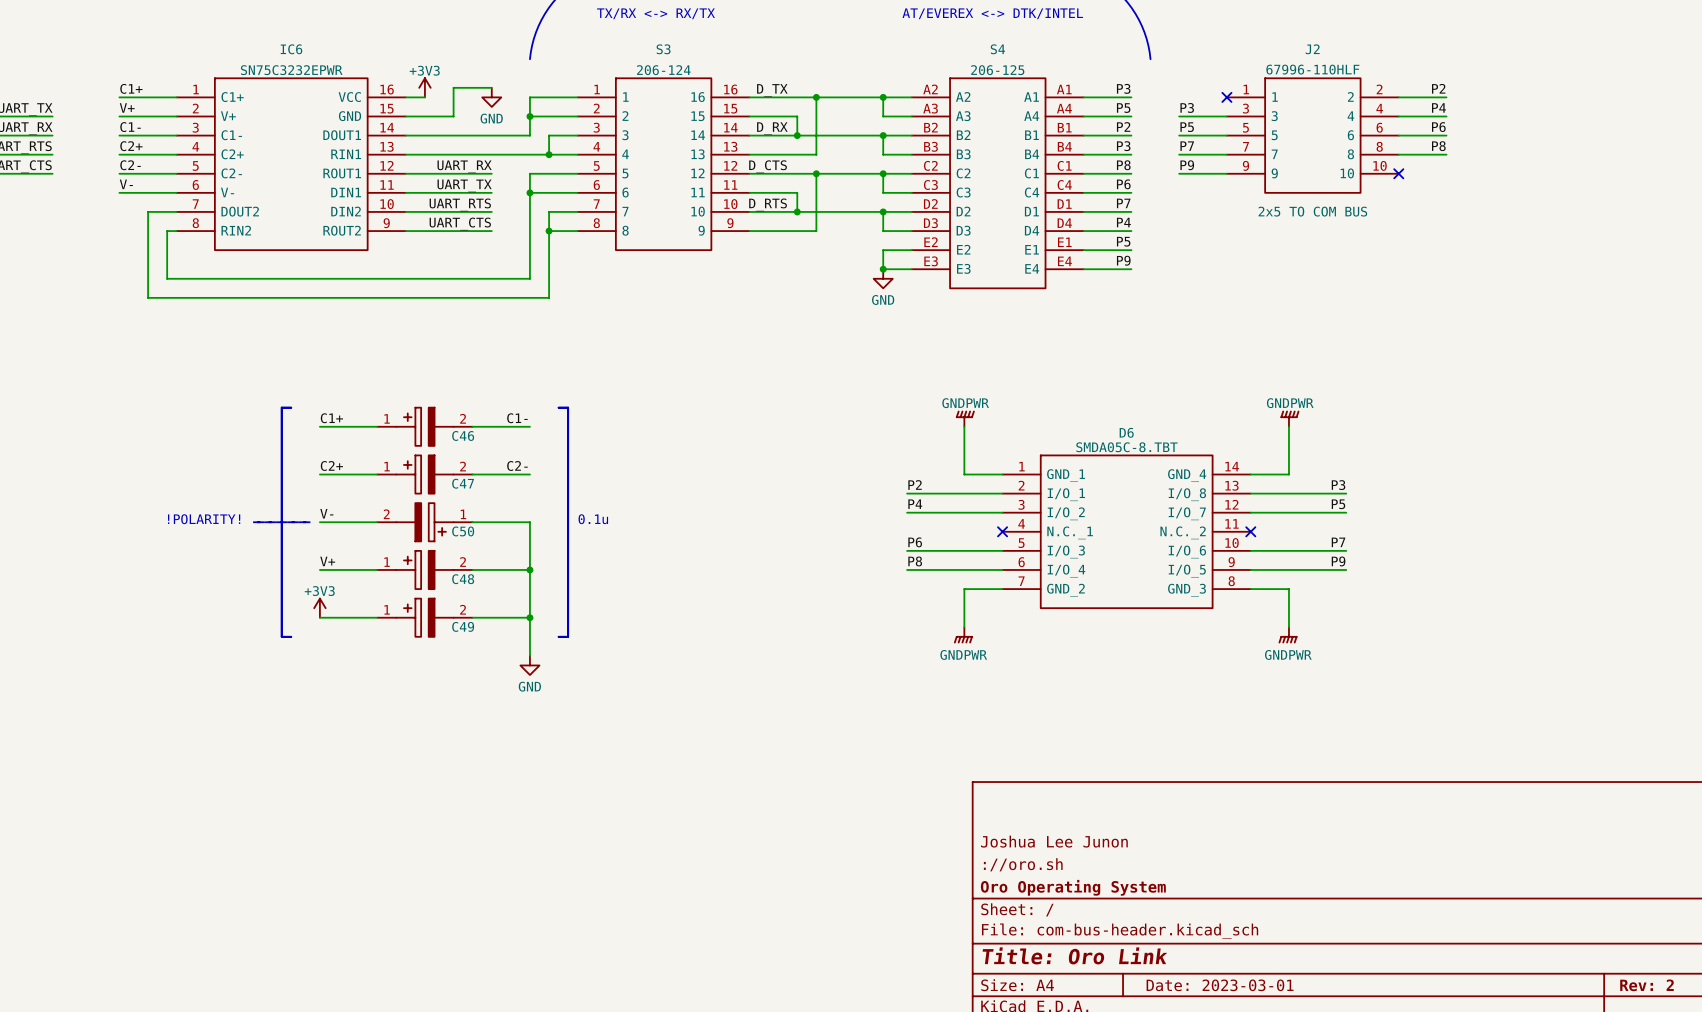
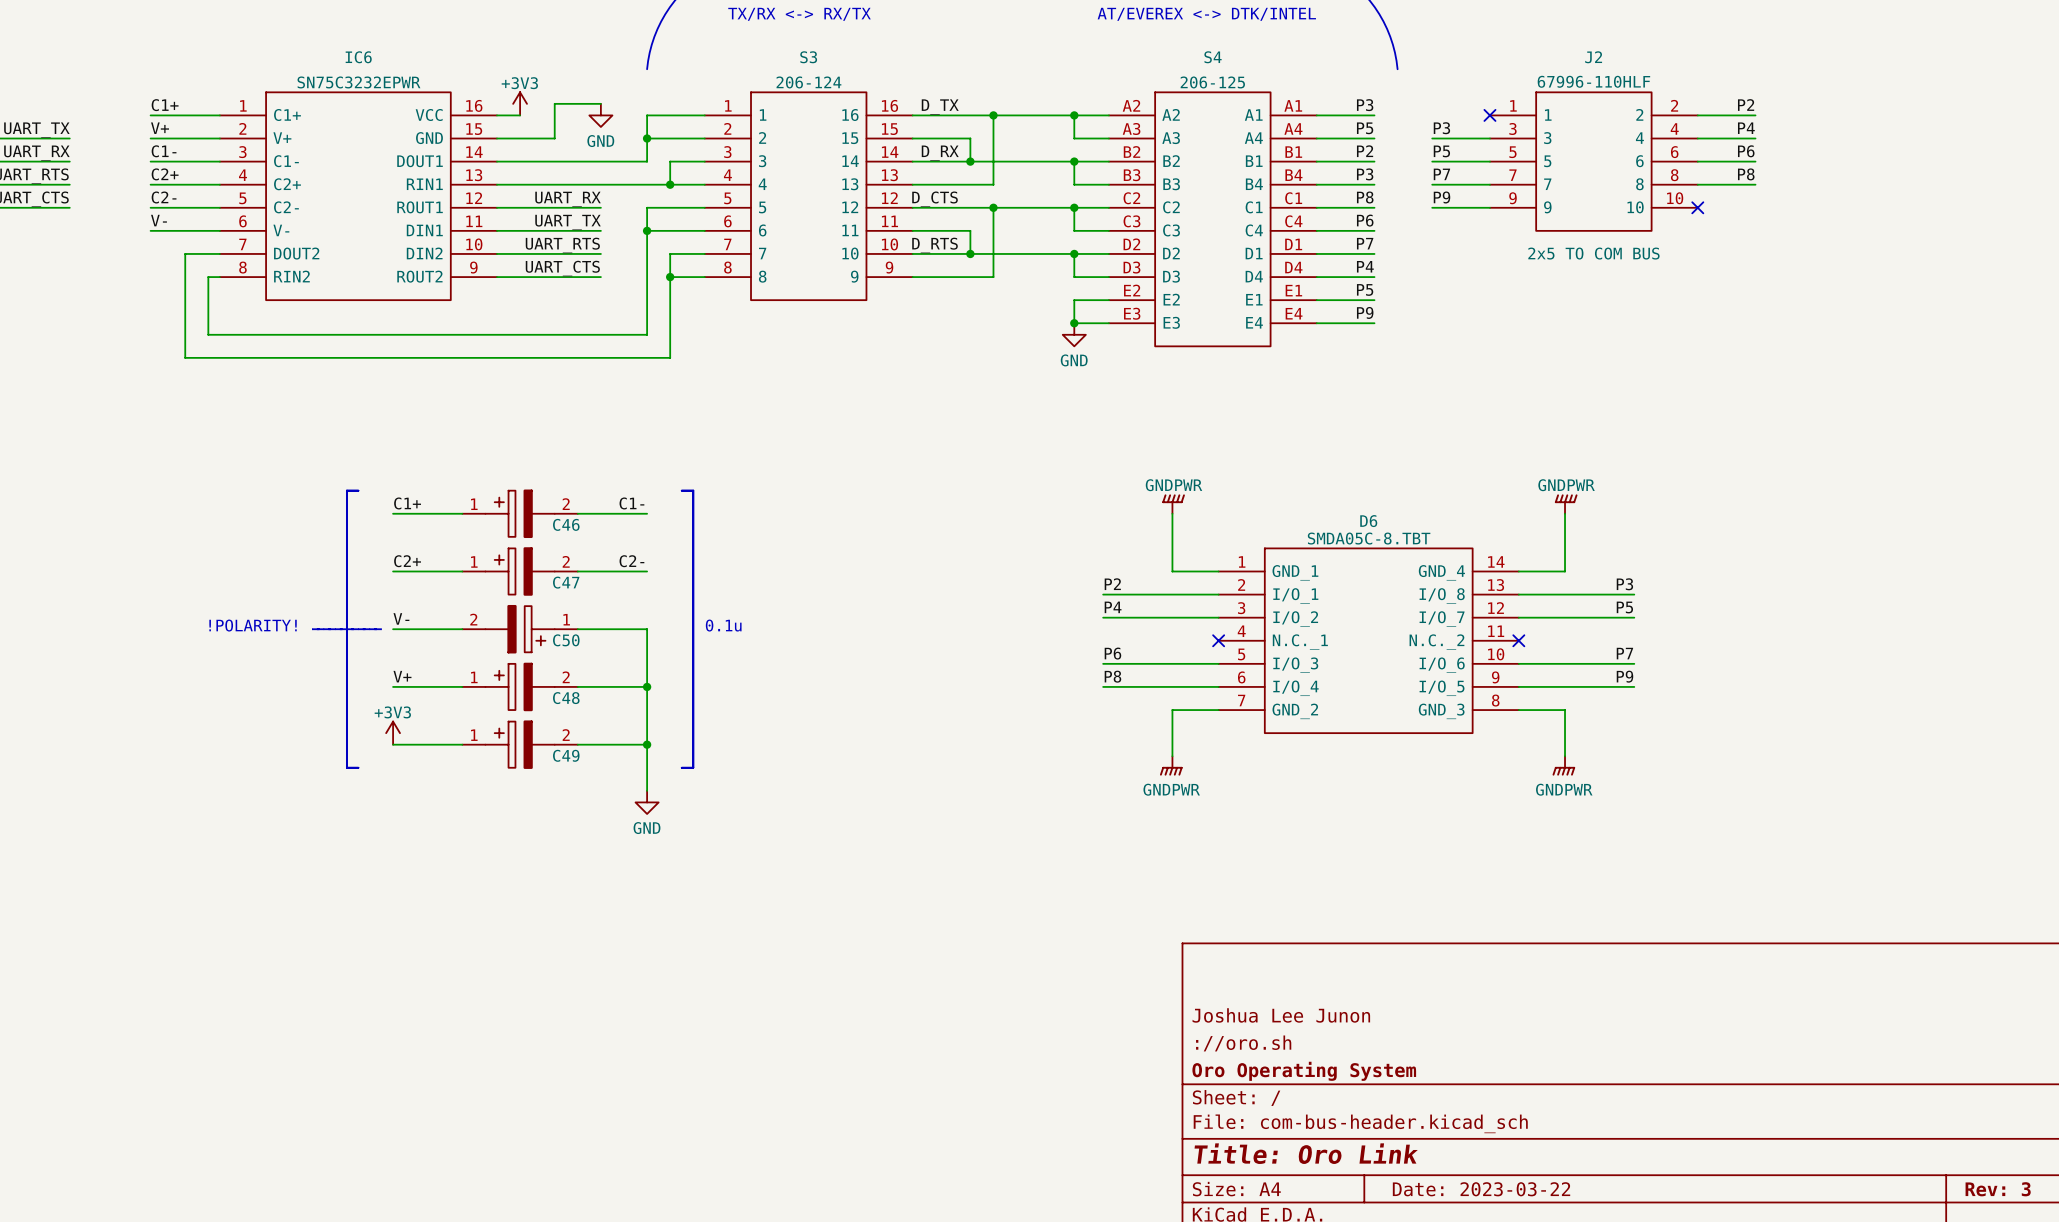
title block: Date: 2023-03-01 (1220, 985) -> Date: 2023-03-22 (1481, 1189)
title block: Rev: 2 (1646, 985) -> Rev: 3 (1998, 1189)

